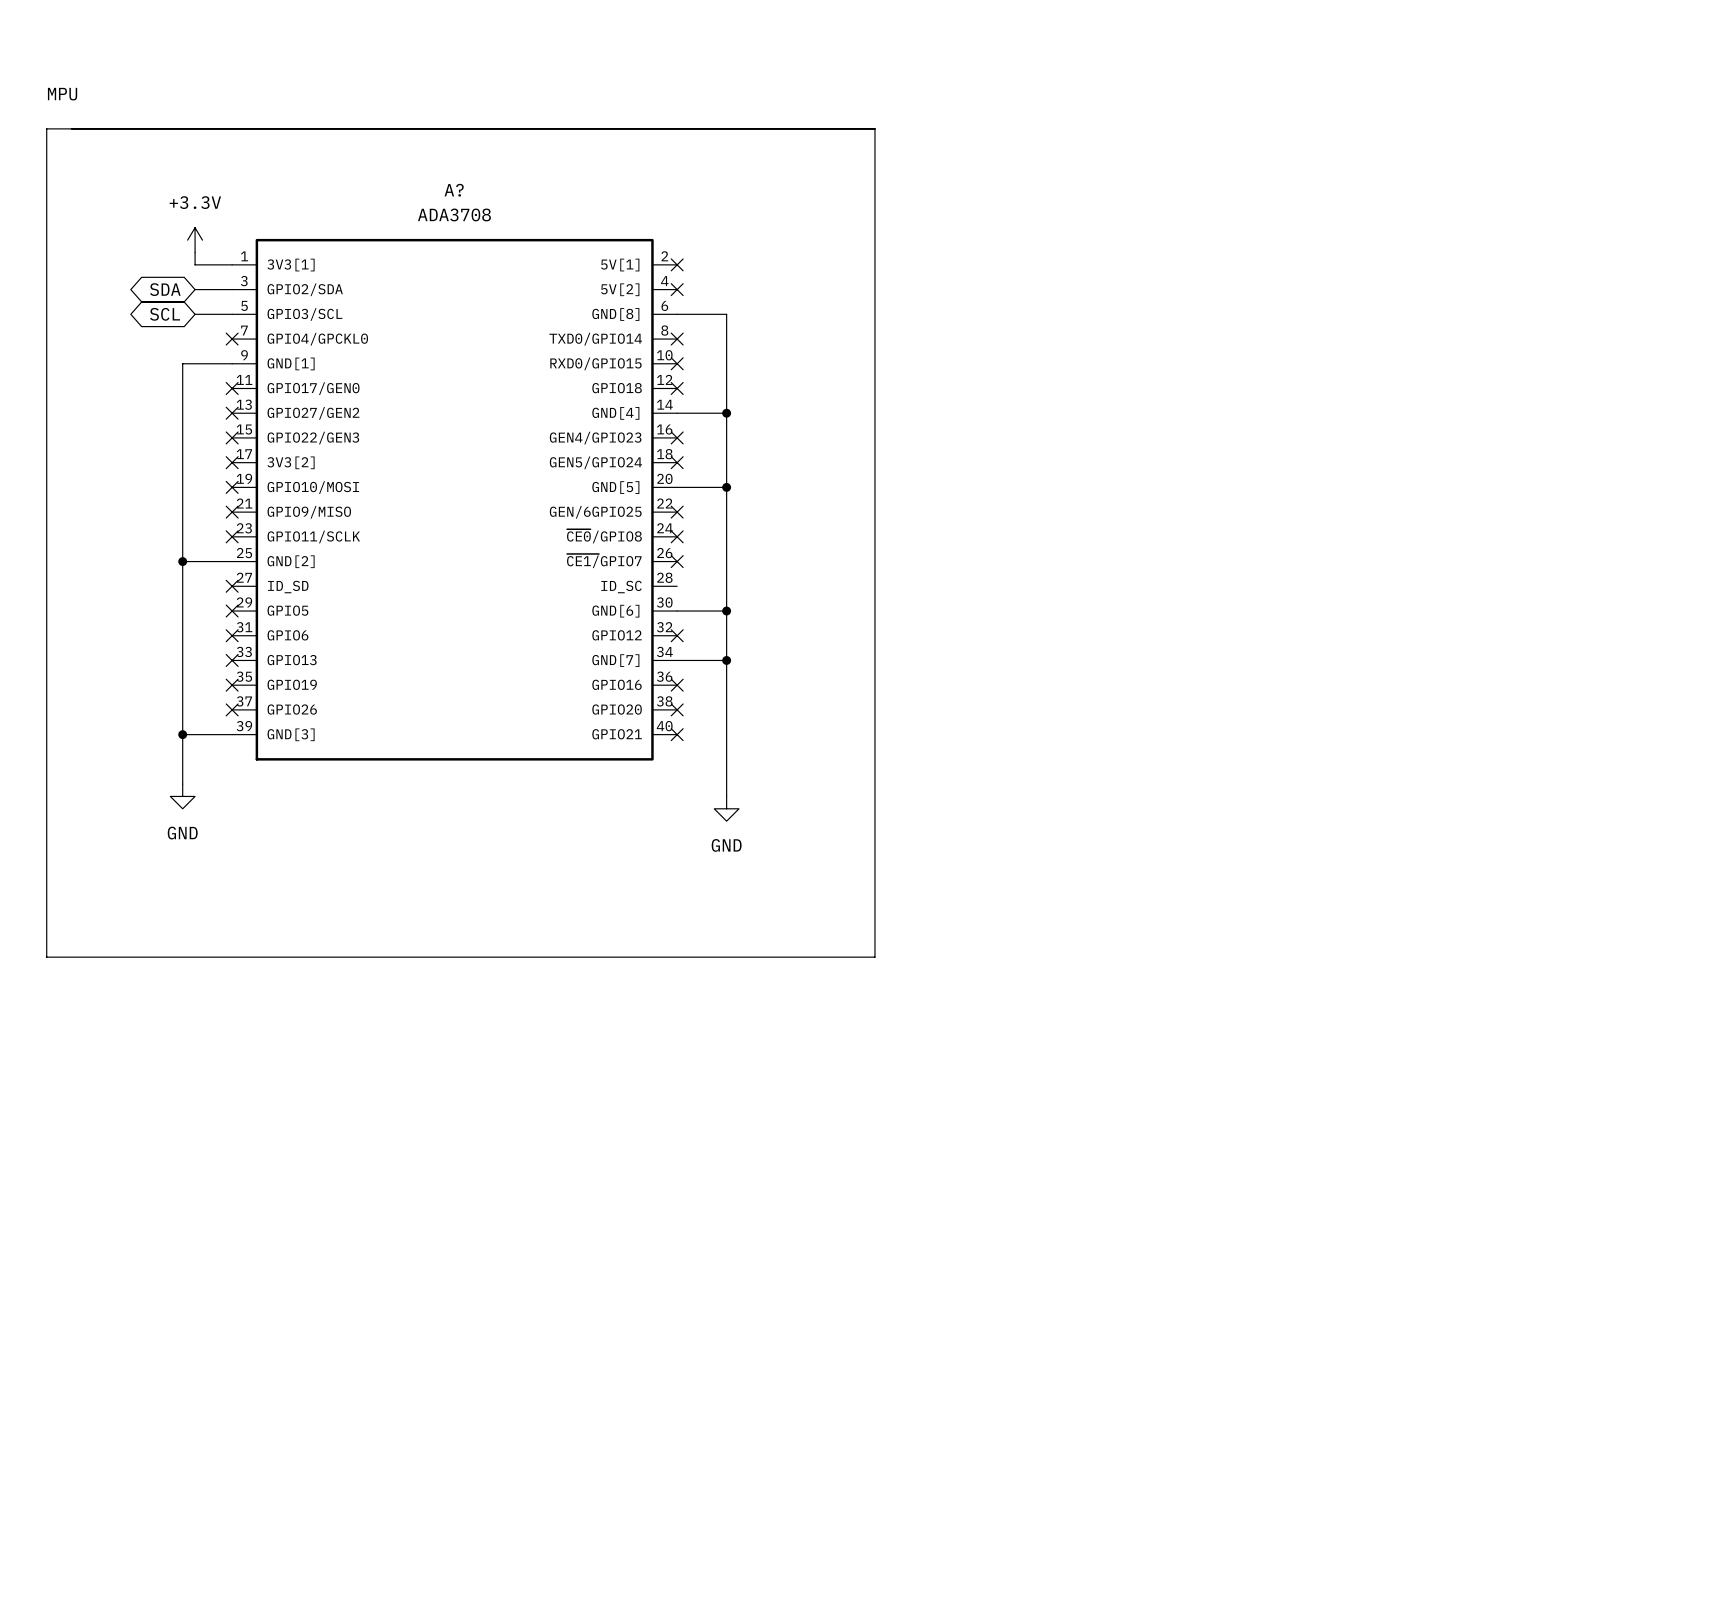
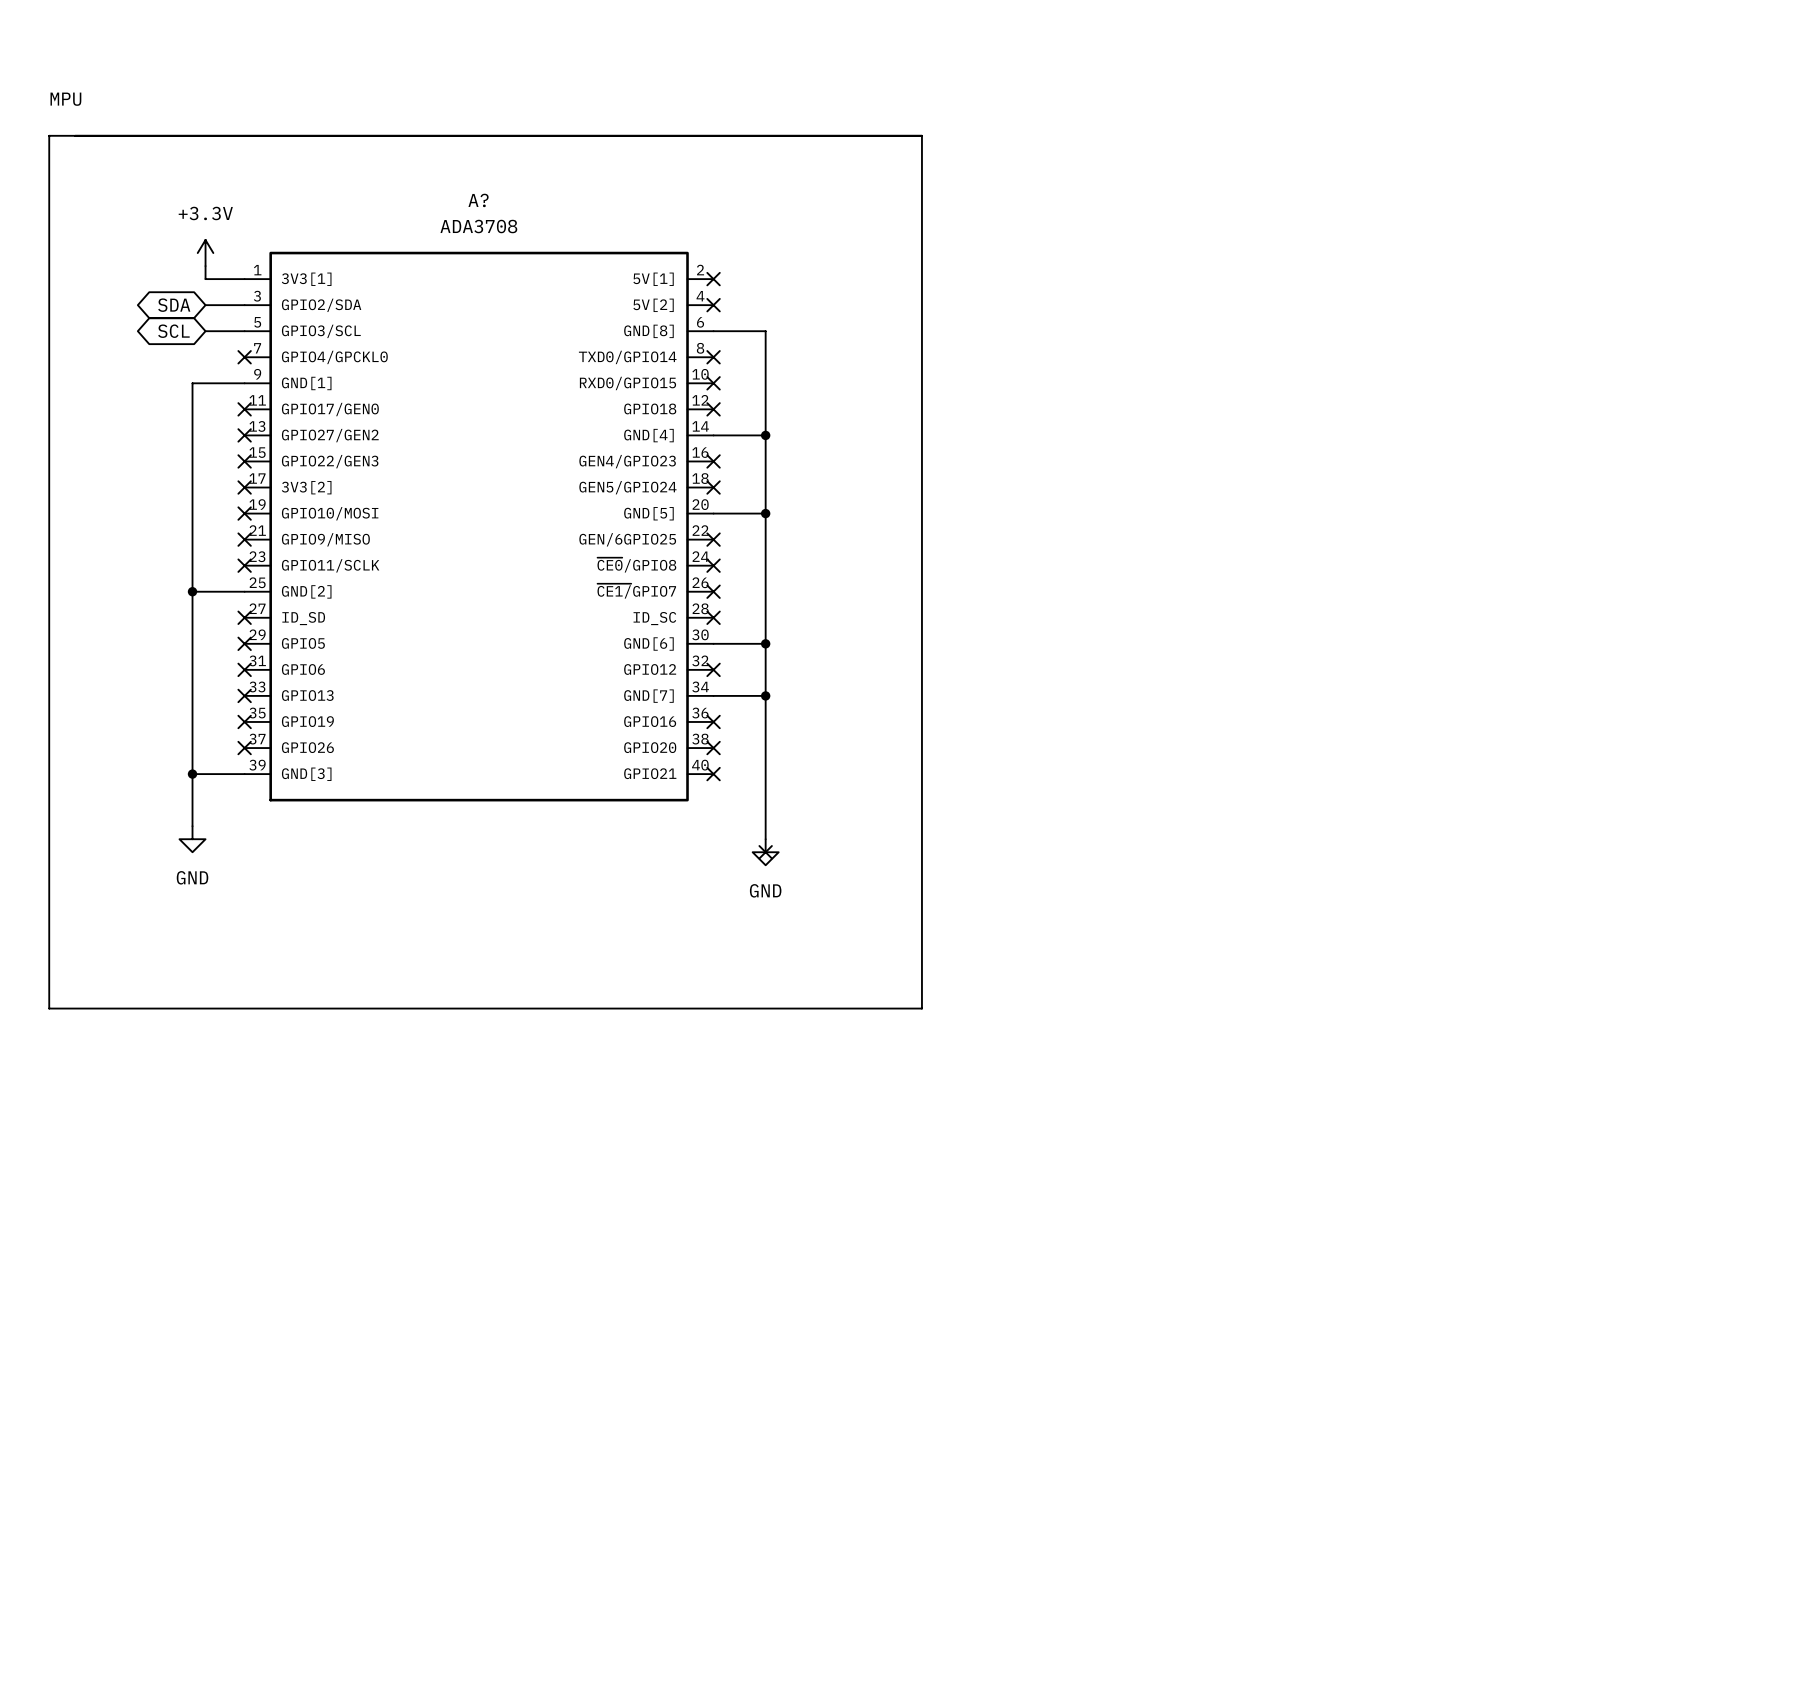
no-connect mark: none -> (713, 617)
no-connect mark: none -> (765, 852)

